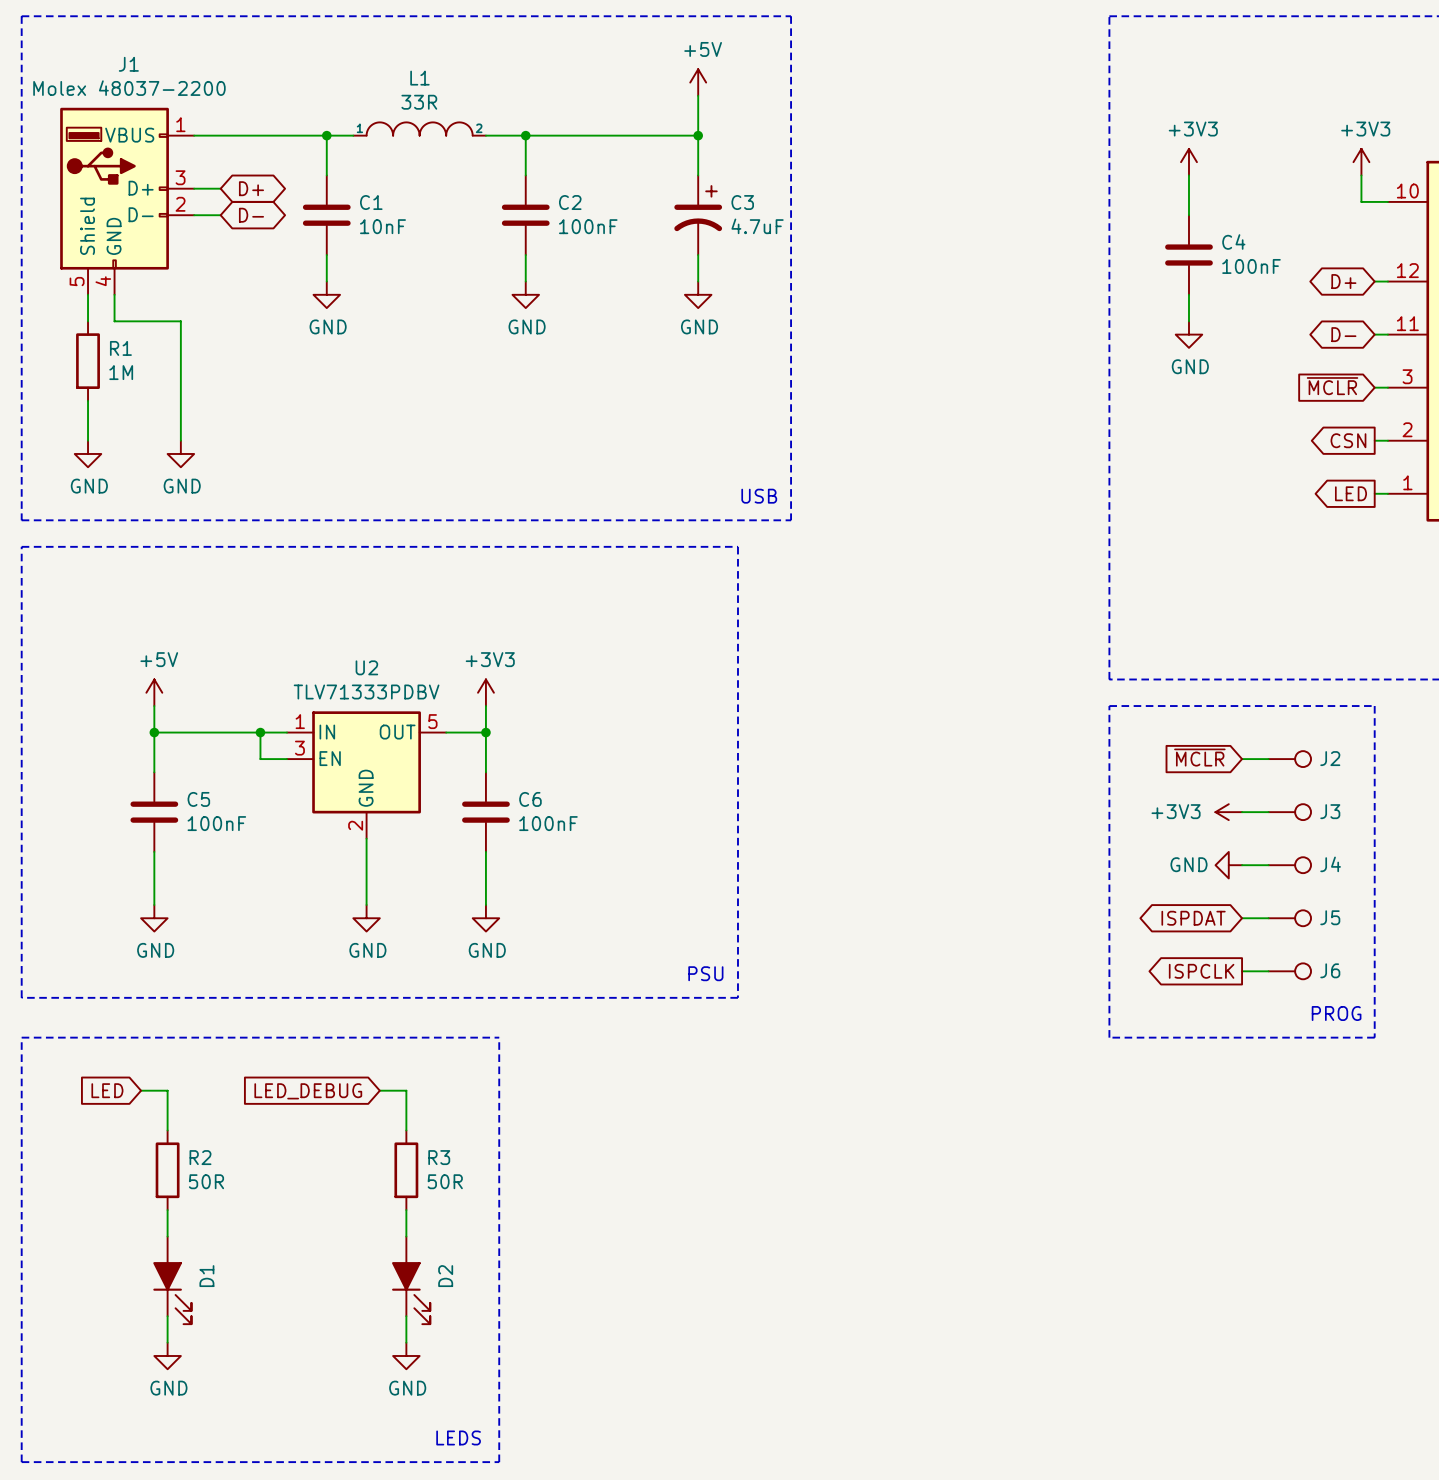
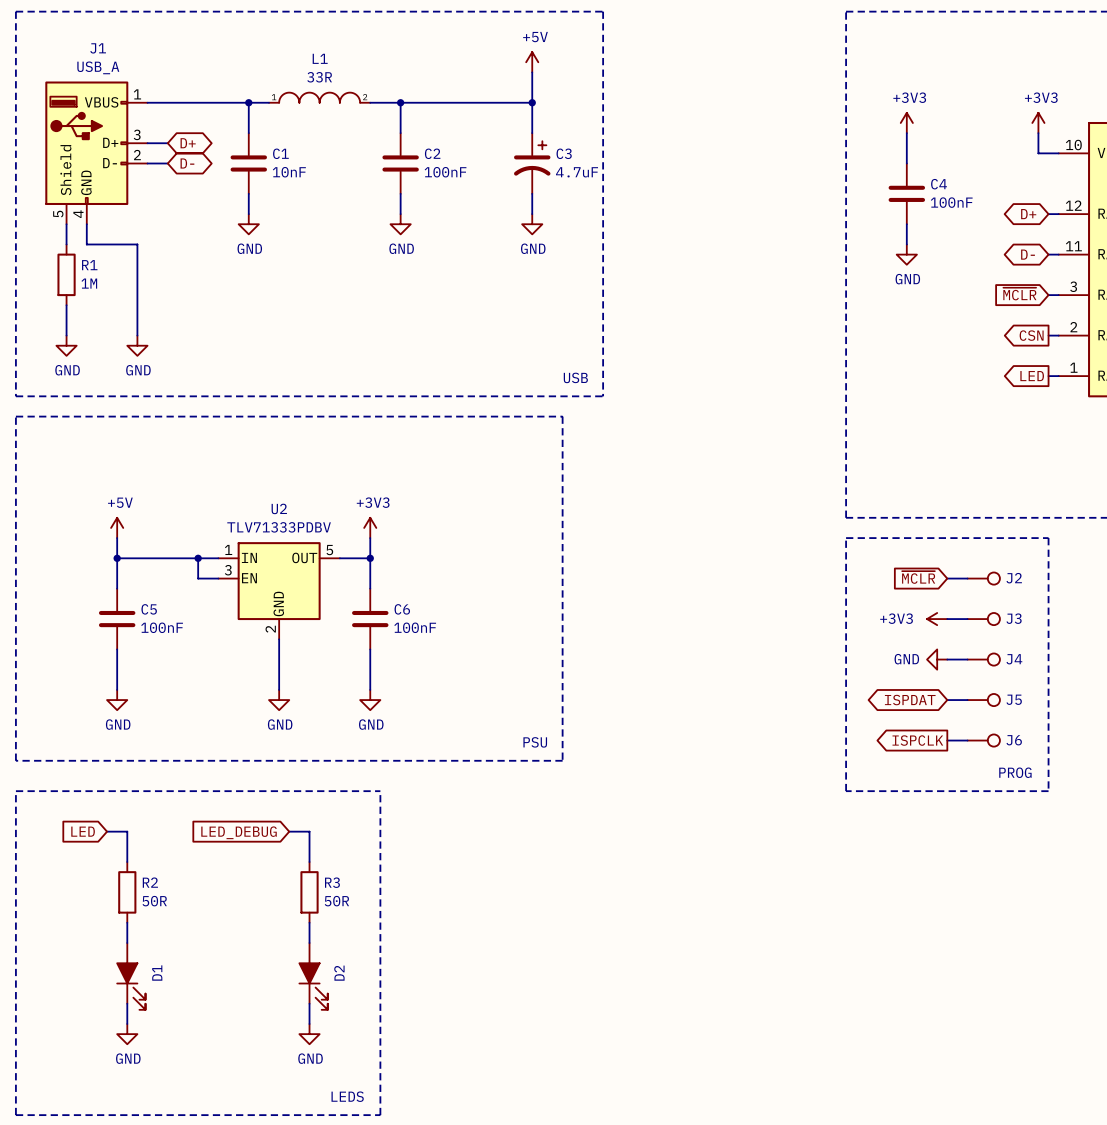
J1 value: Molex 48037-2200 (129, 88) -> USB_A (98, 67)

